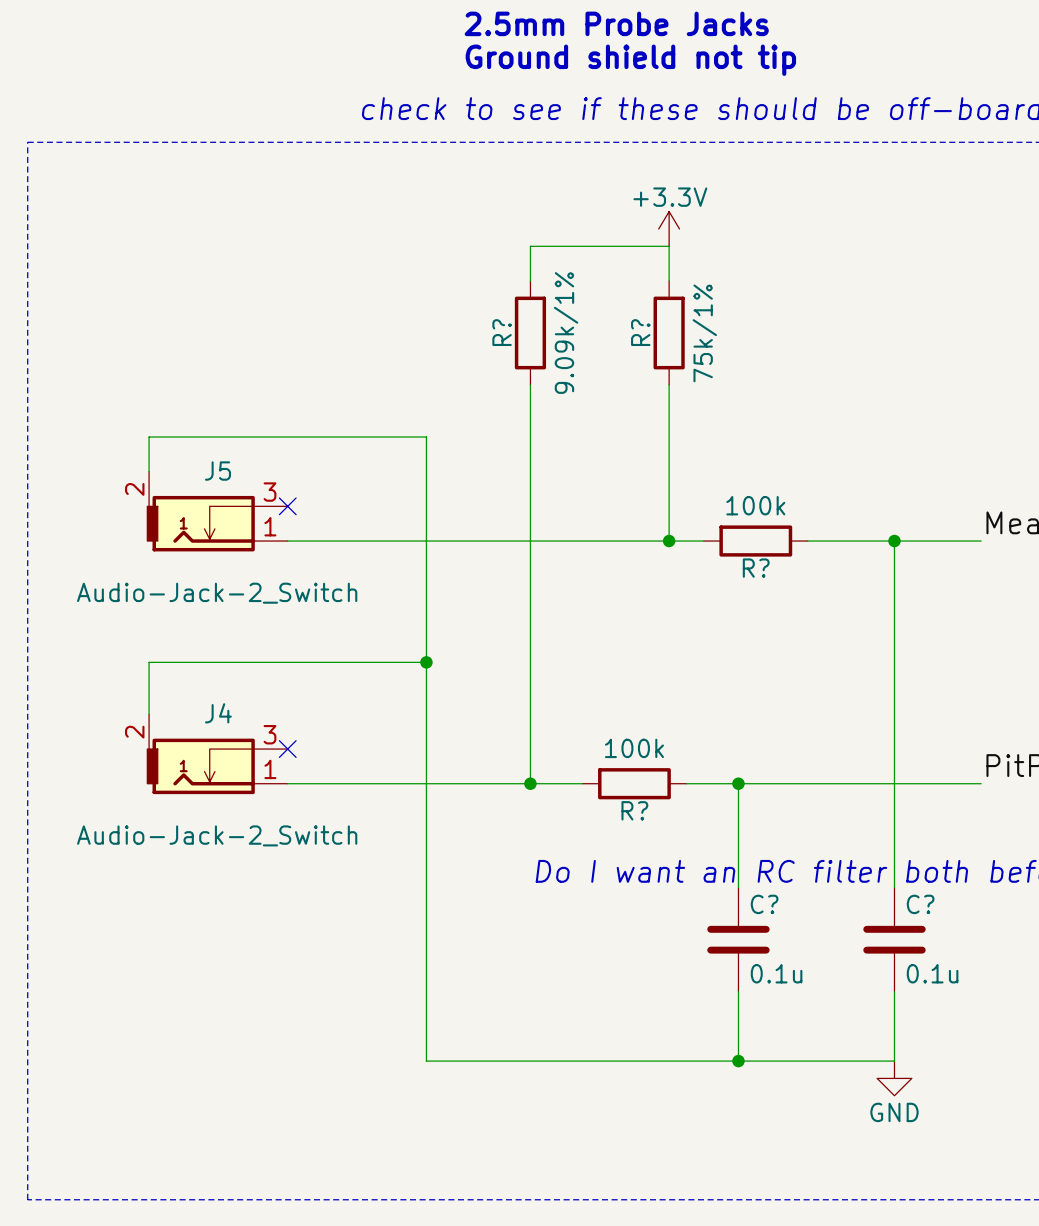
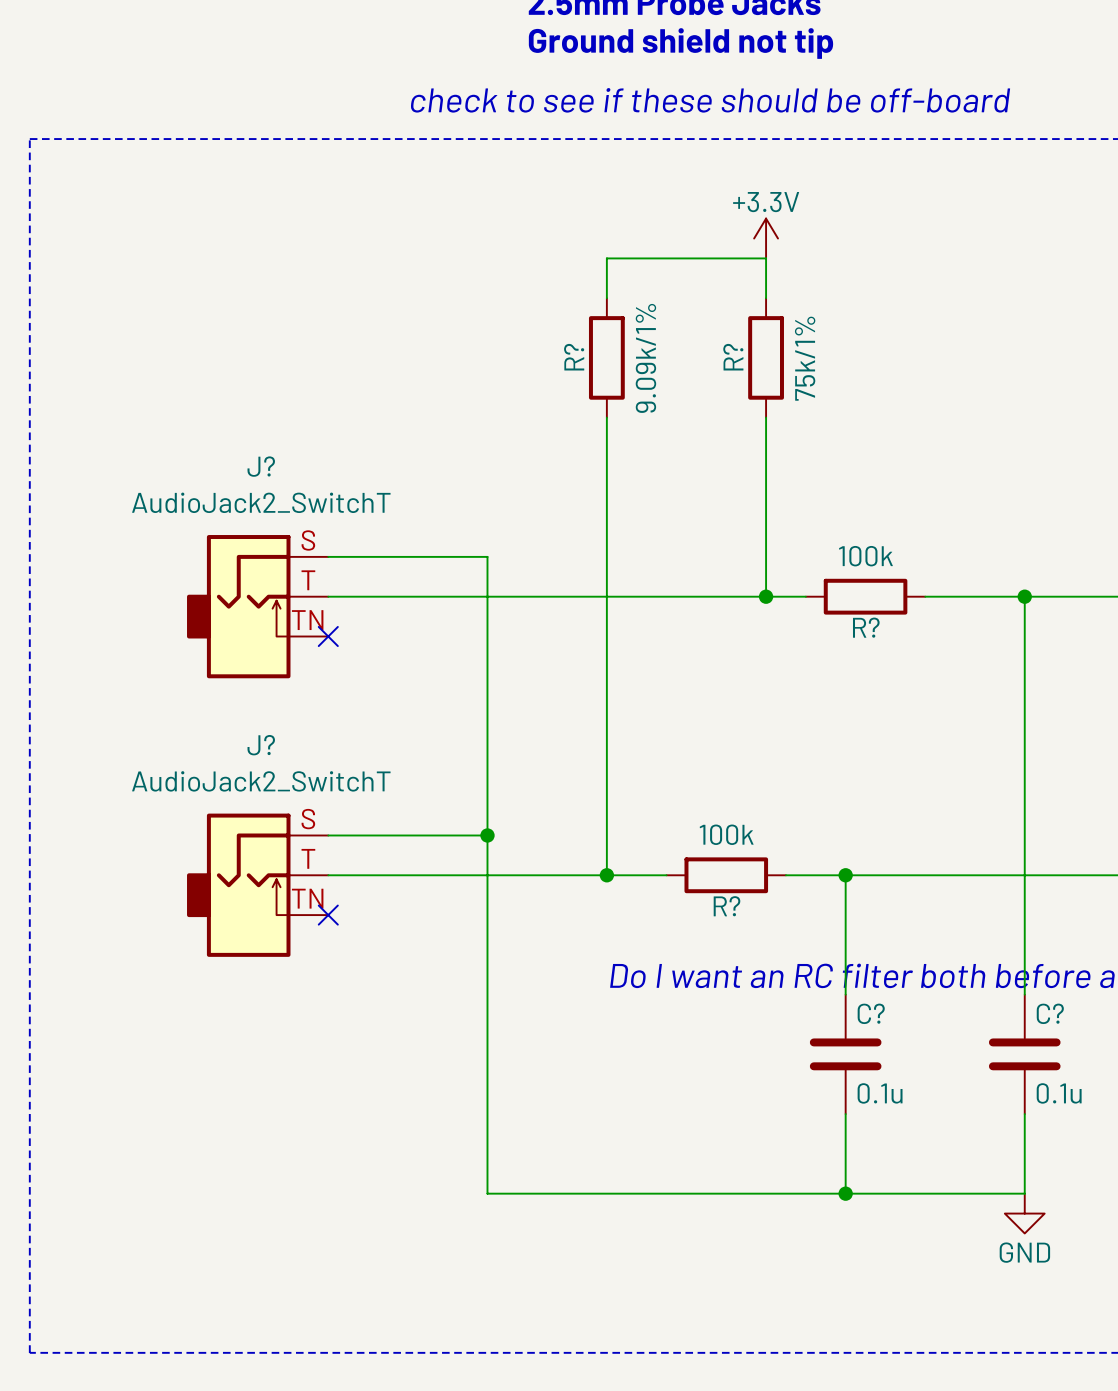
wire: (149, 471) (149, 437) (426, 437) (426, 506) -> (328, 556) (487, 556)
no-connect mark position: (287, 506) -> (328, 636)
J5: Audio-Jack-2_Switch (217, 511) -> none
J?: none -> AudioJack2_SwitchT (257, 606)
wire: (426, 662) (149, 662) (149, 714) -> none
junction: (426, 662) -> none
wire: none -> (328, 835) (487, 835)
no-connect mark position: (287, 749) -> (328, 915)
junction: none -> (487, 835)
J4: Audio-Jack-2_Switch (217, 754) -> none
J?: none -> AudioJack2_SwitchT (257, 885)

